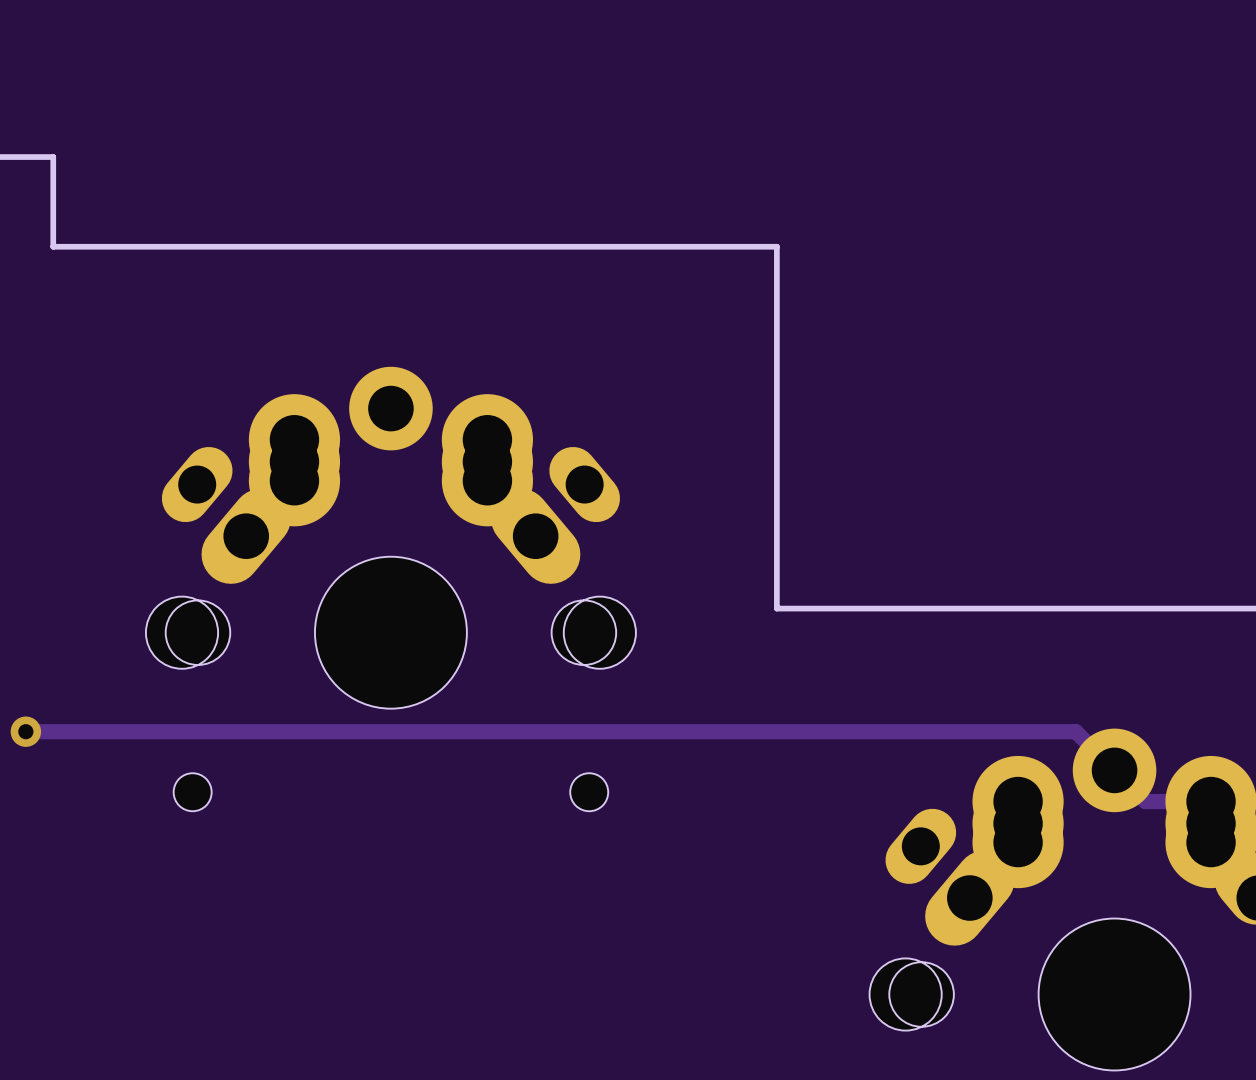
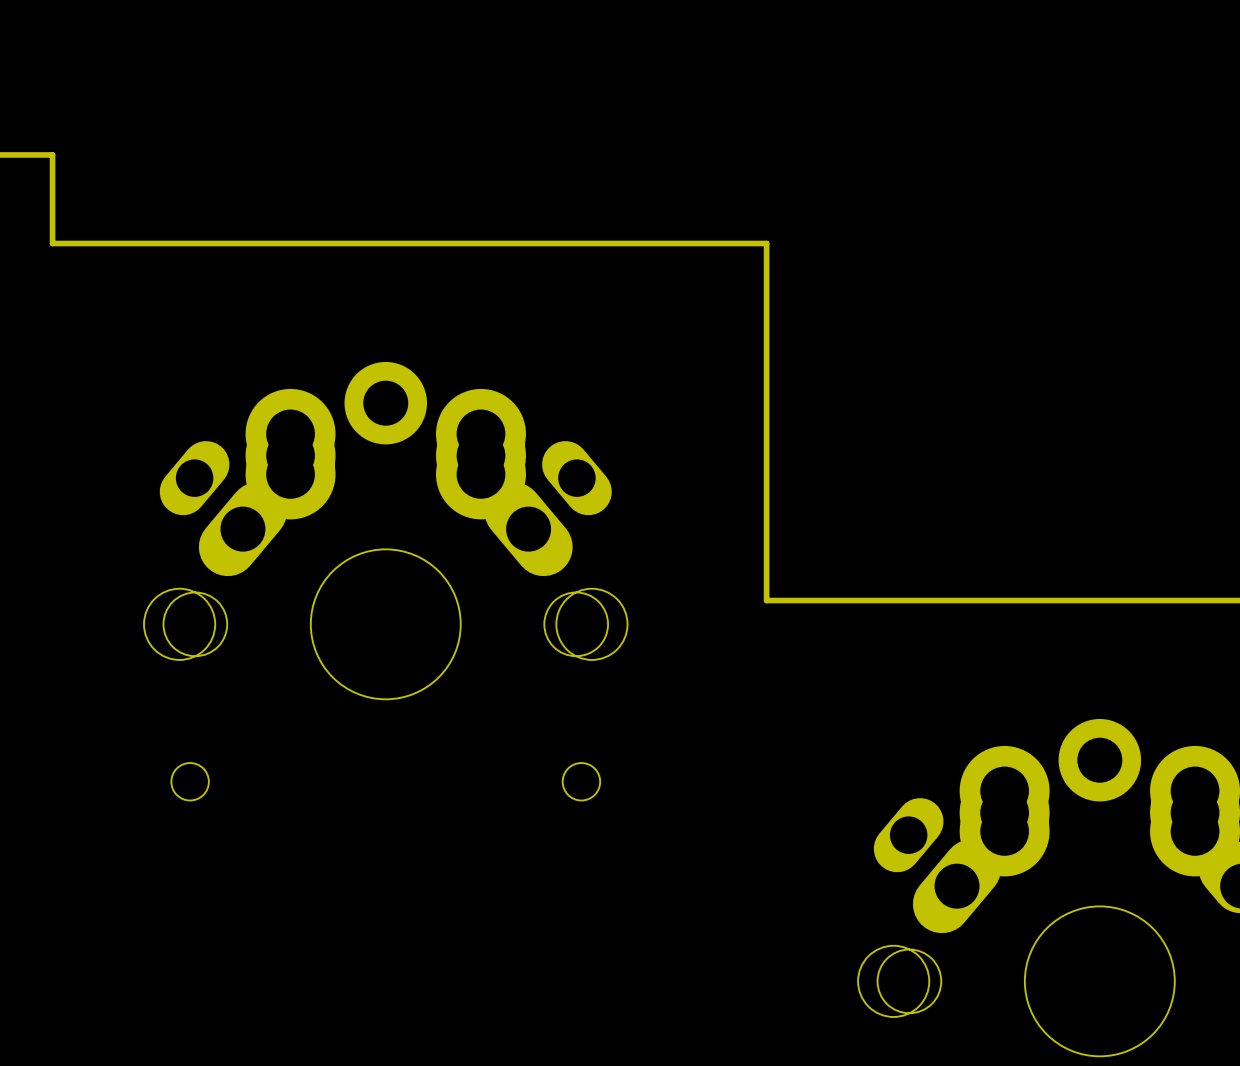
track: (25, 731) (1075, 731) (1145, 801) (1211, 801) -> none
via: (25, 731) -> none

